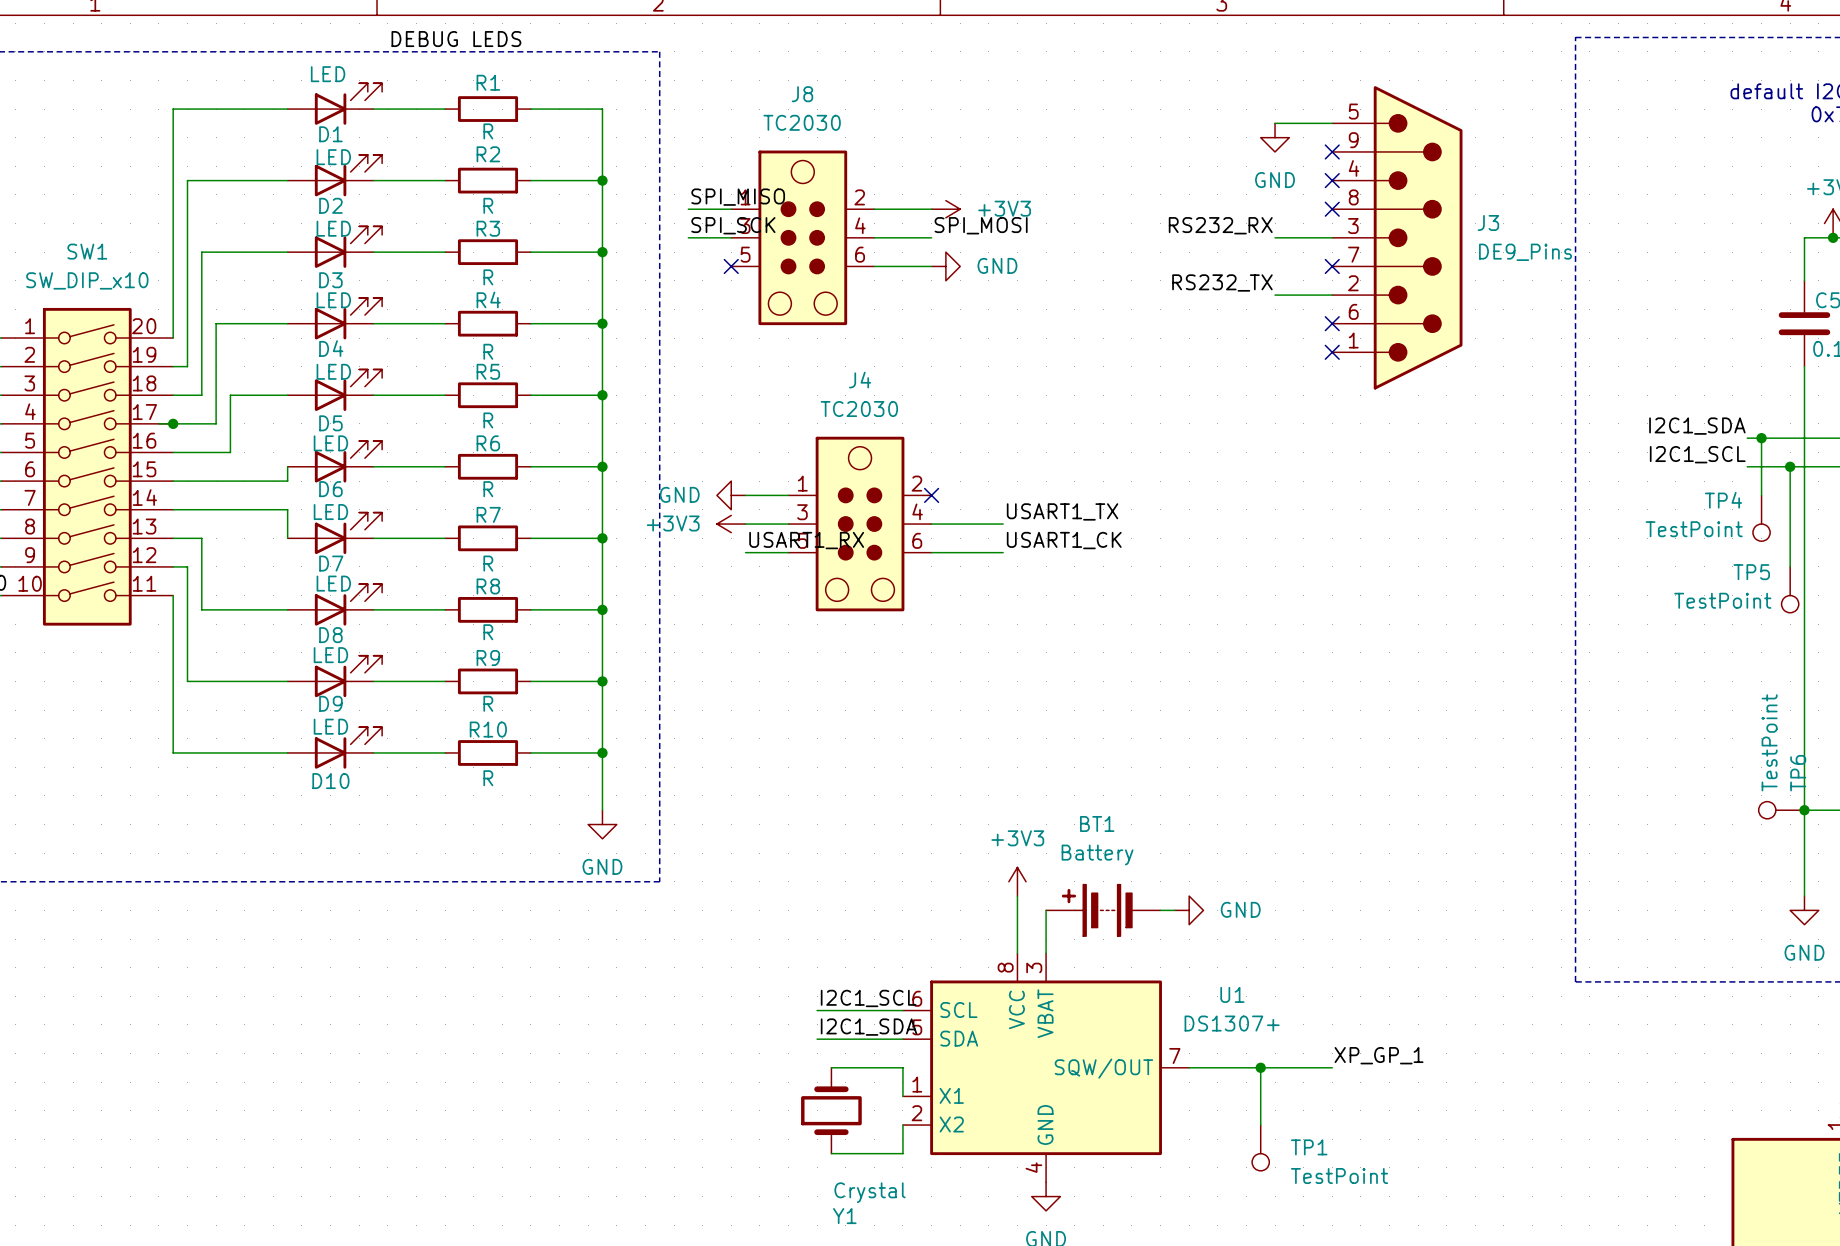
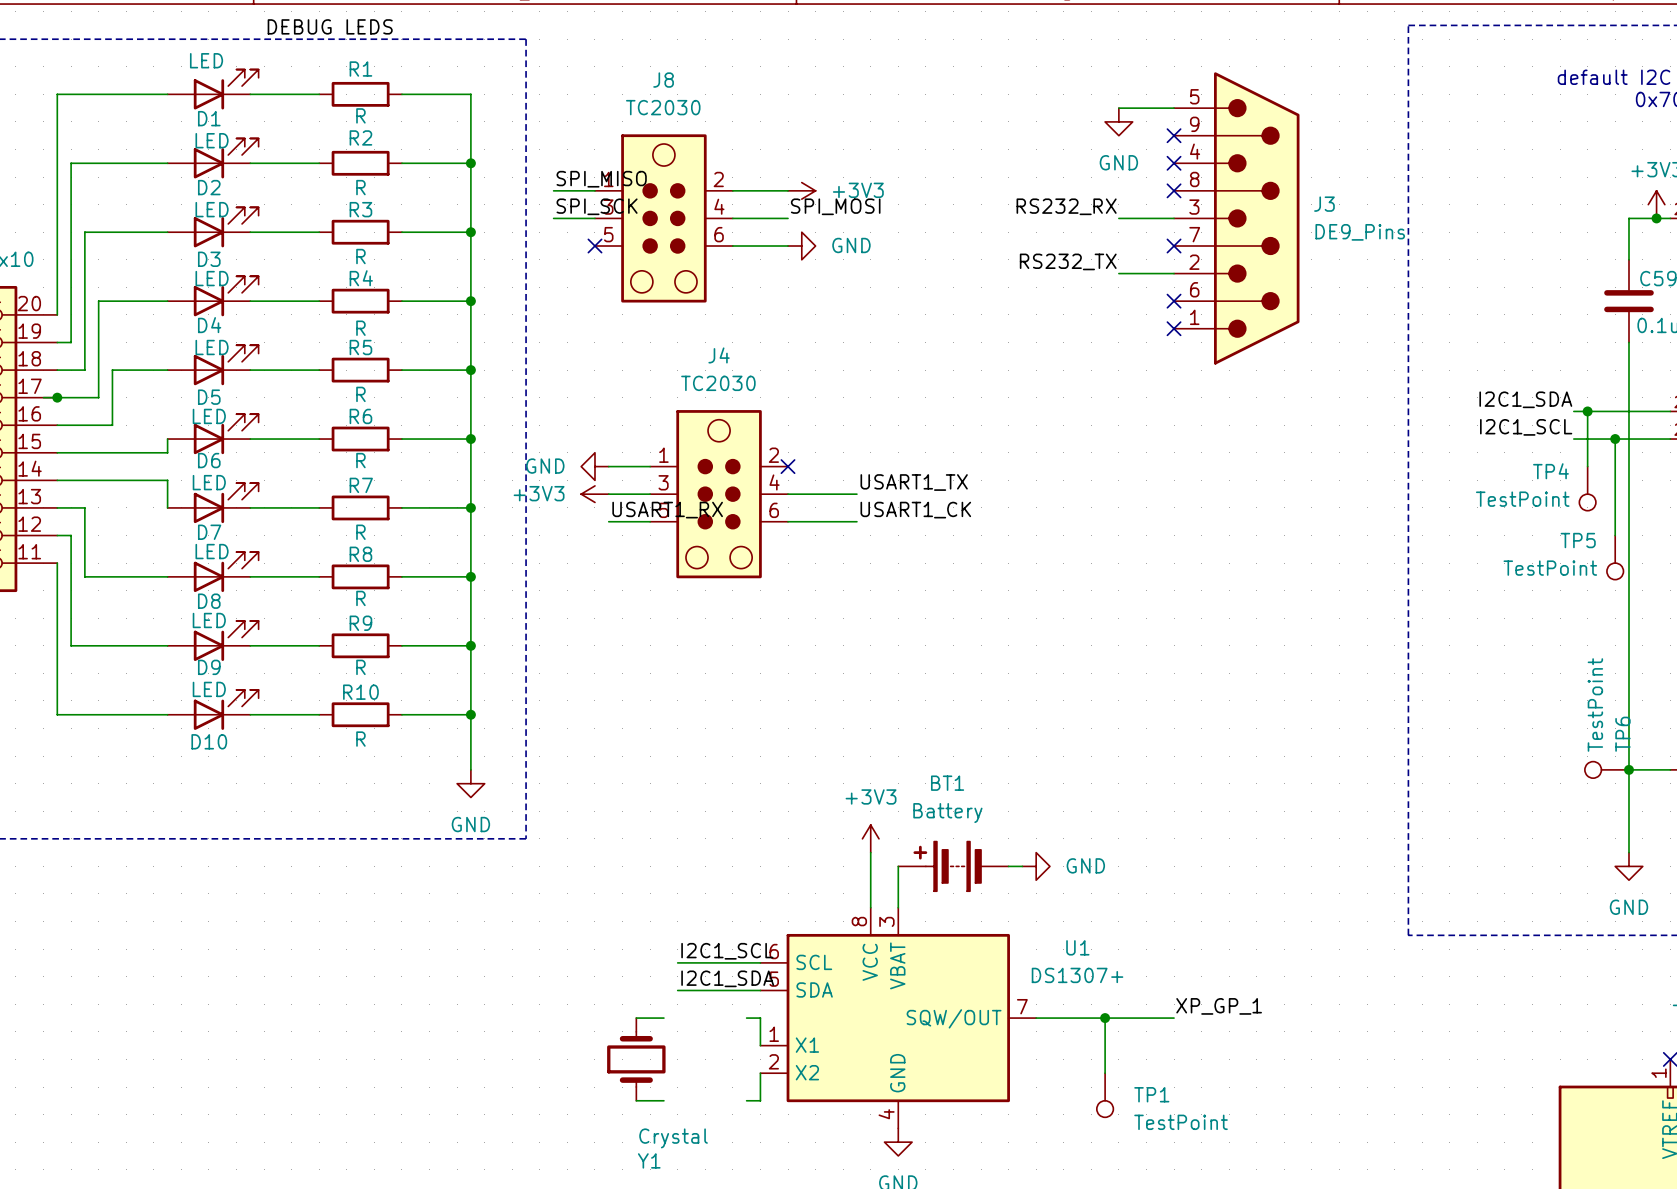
wire: none -> (636, 1018) (663, 1018)
wire: (831, 1067) (888, 1067) -> none
Y1 position: (831, 1110) -> (636, 1059)
wire: none -> (636, 1100) (663, 1100)
wire: (831, 1153) (888, 1153) -> none

